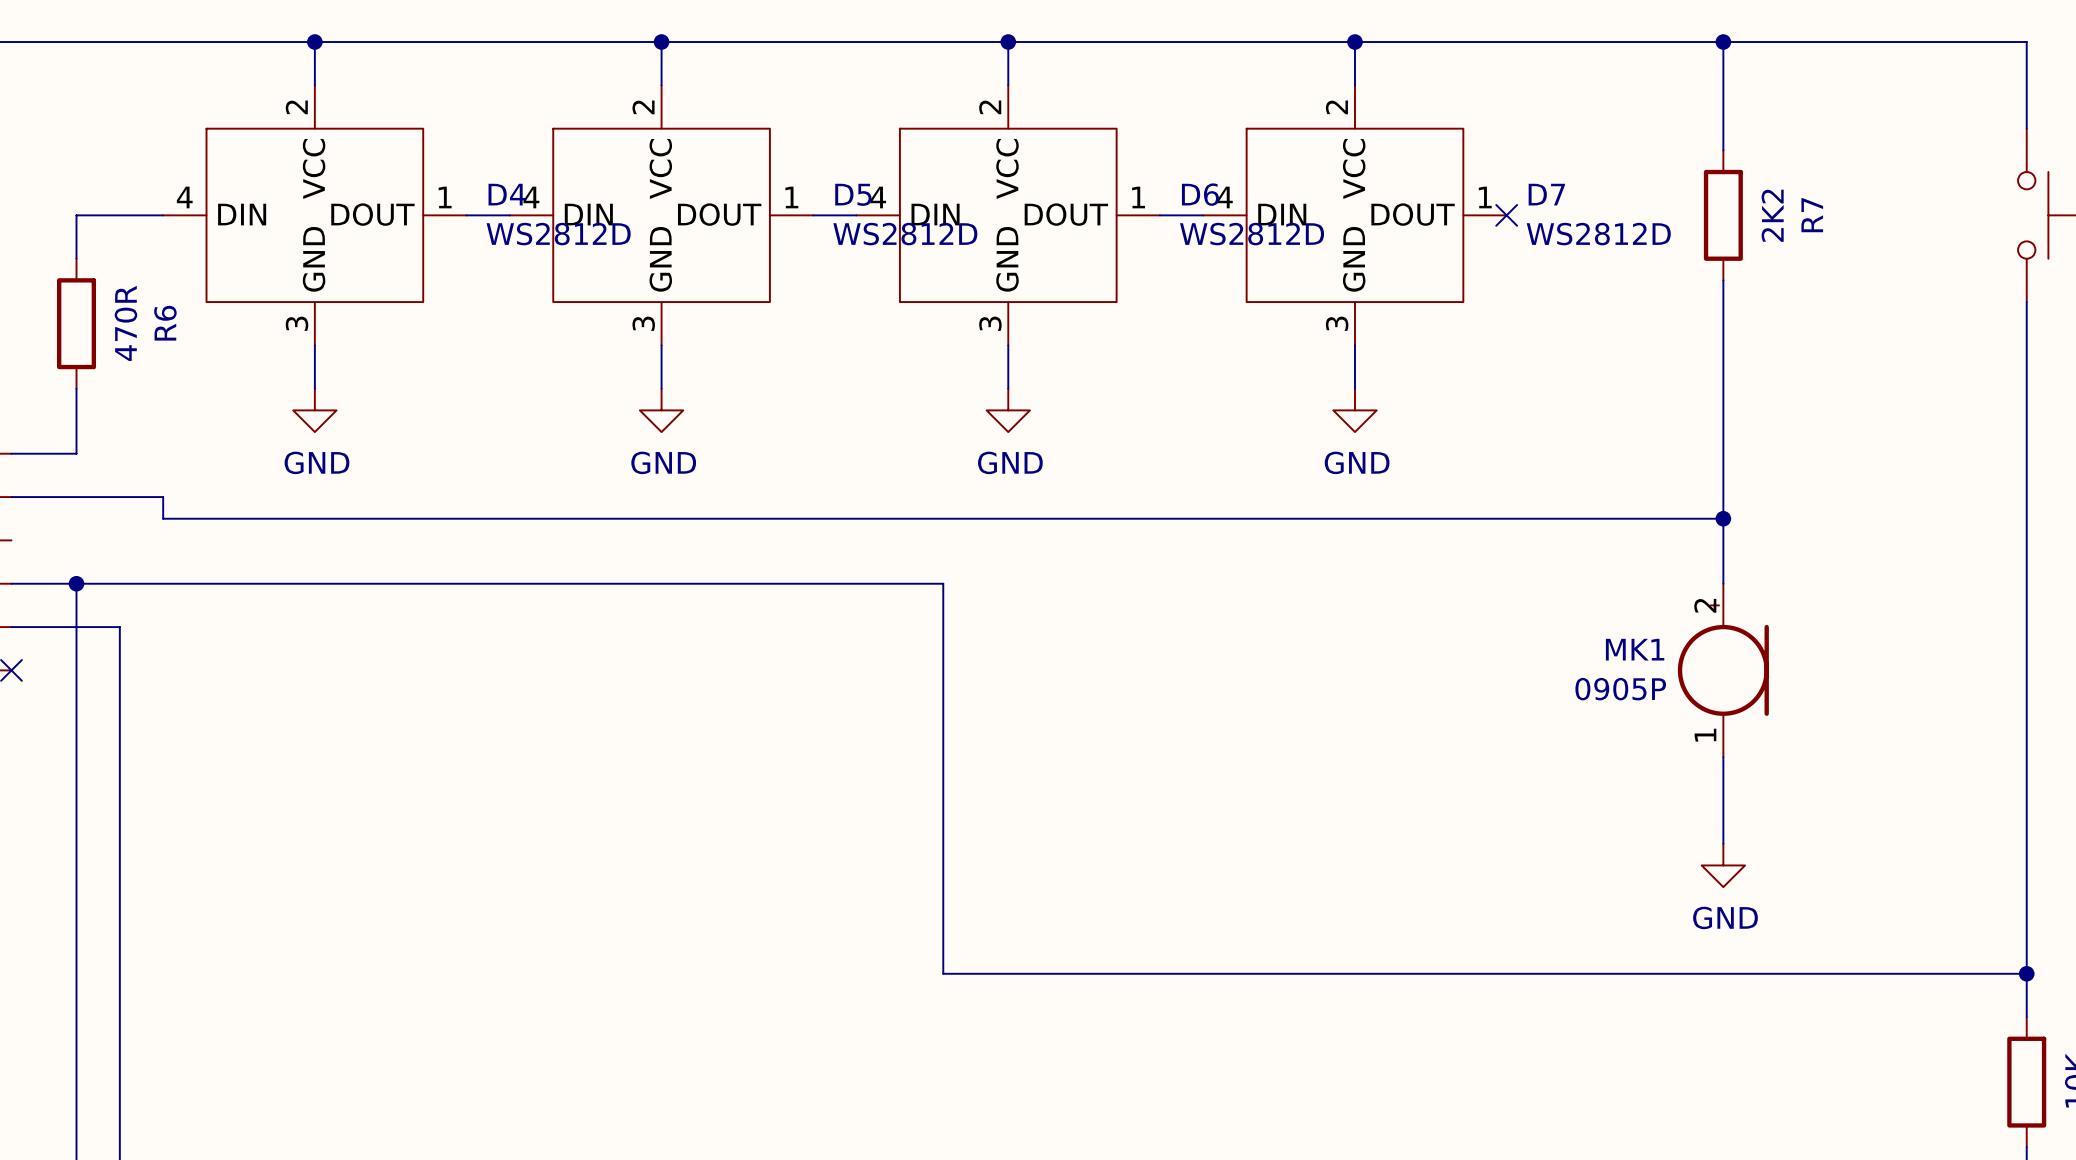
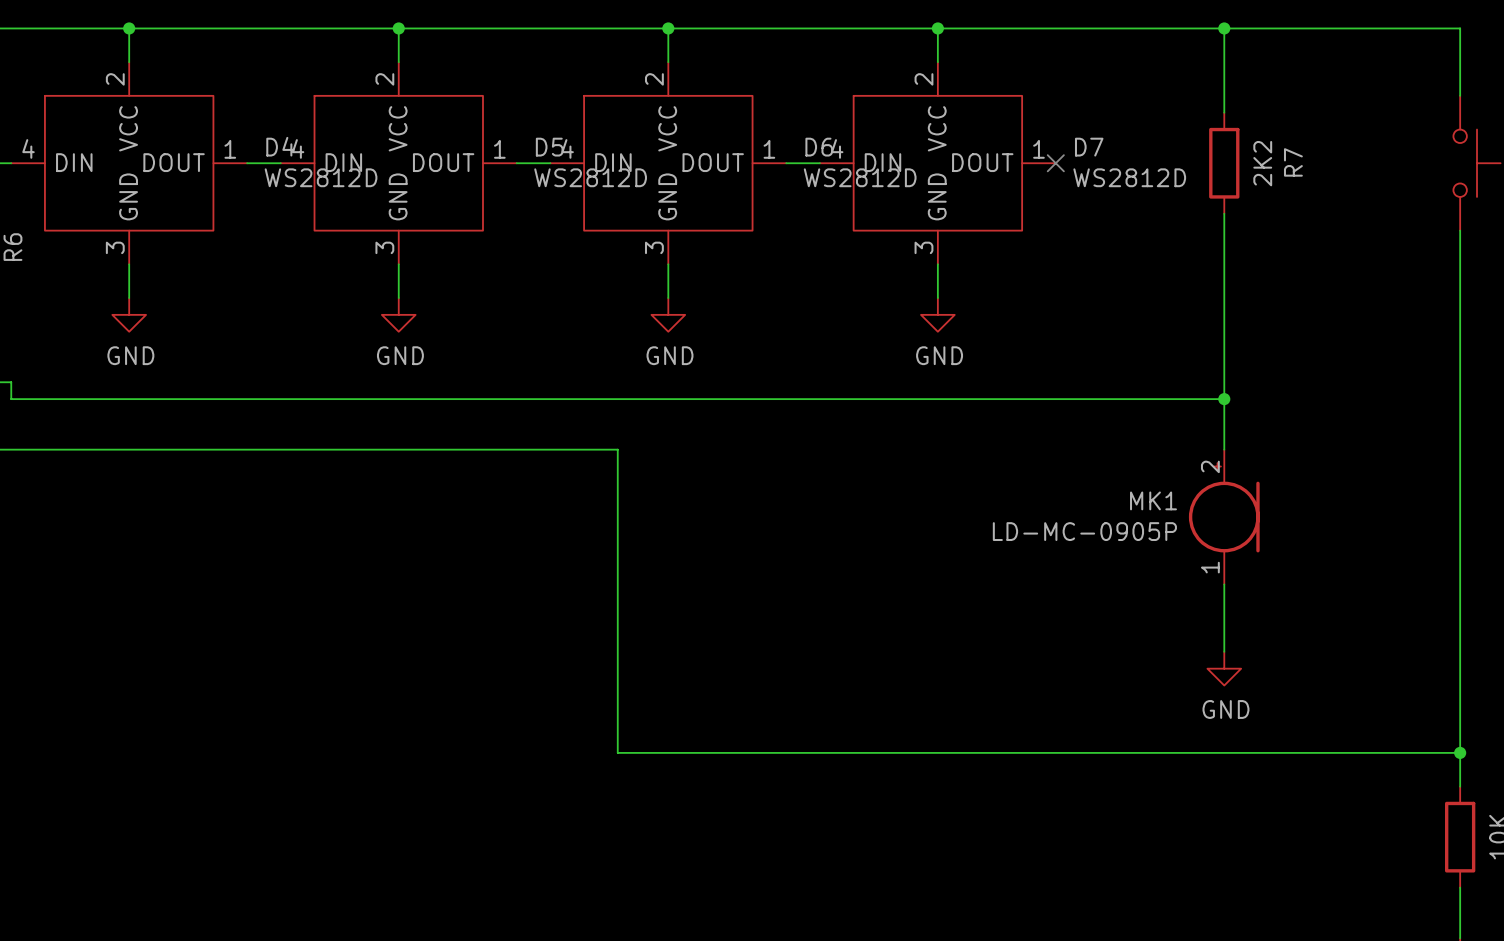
MK1 value: 0905P (1620, 689) -> LD-MC-0905P (1084, 531)

